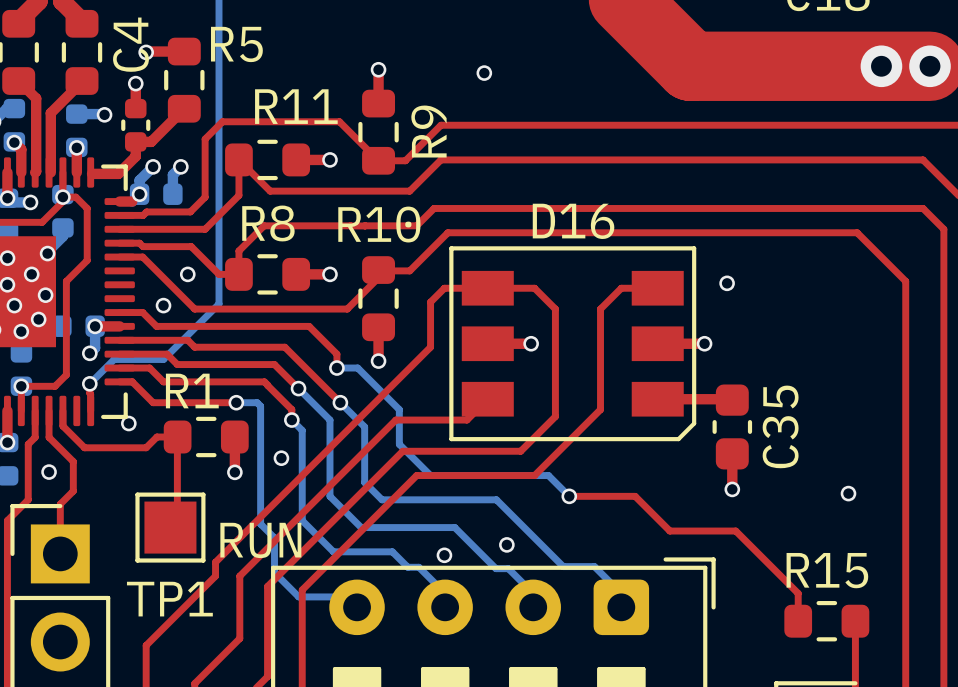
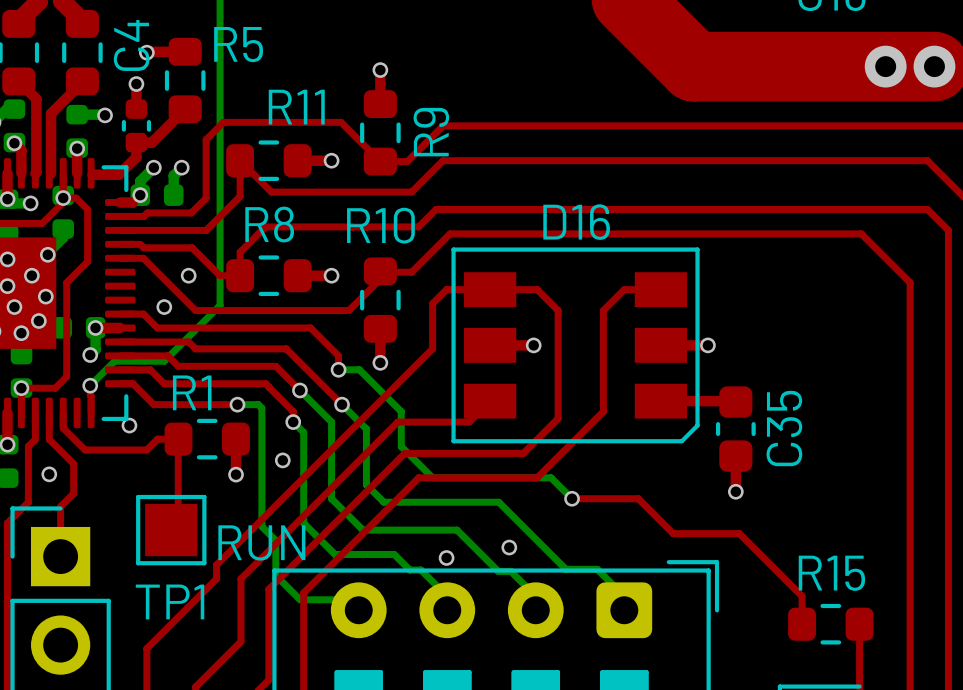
via: (484, 73) -> none
via: (727, 283) -> none
via: (848, 493) -> none

